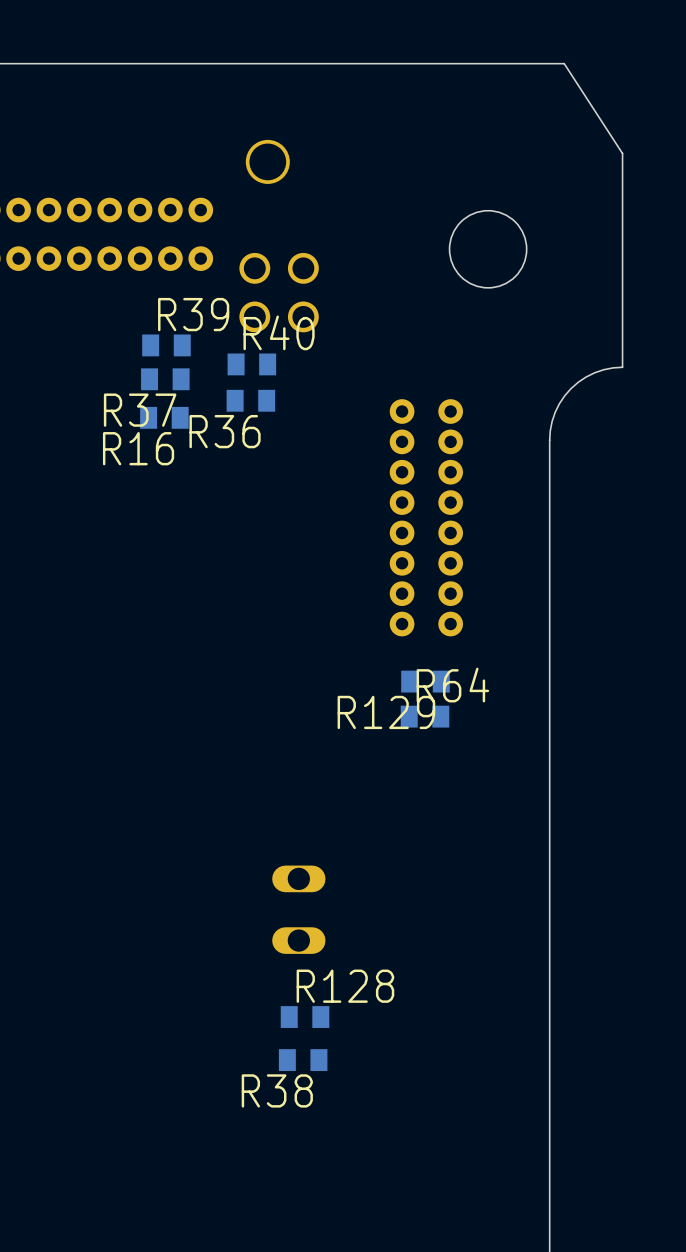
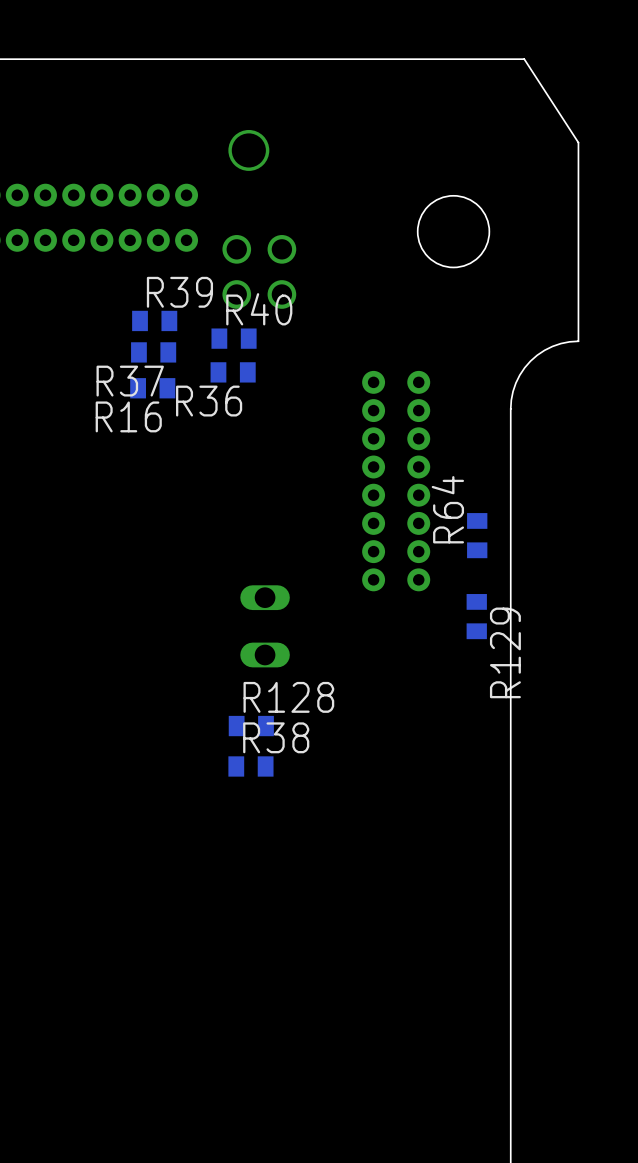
R129 rotation: 0° (425, 681) -> 90° clockwise (476, 616)
R129 position: (425, 681) -> (476, 616)
R64 name position: R64 (452, 685) -> R64 (447, 509)
R129 name position: R129 (386, 712) -> R129 (505, 652)
R64 rotation: 0° (425, 716) -> 90° clockwise (477, 535)
R64 position: (425, 716) -> (477, 535)
part position: (298, 909) -> (265, 626)
R128 position: (305, 1017) -> (251, 726)
R38 position: (303, 1060) -> (250, 766)
R38 name position: R38 (277, 1090) -> R38 (276, 737)

